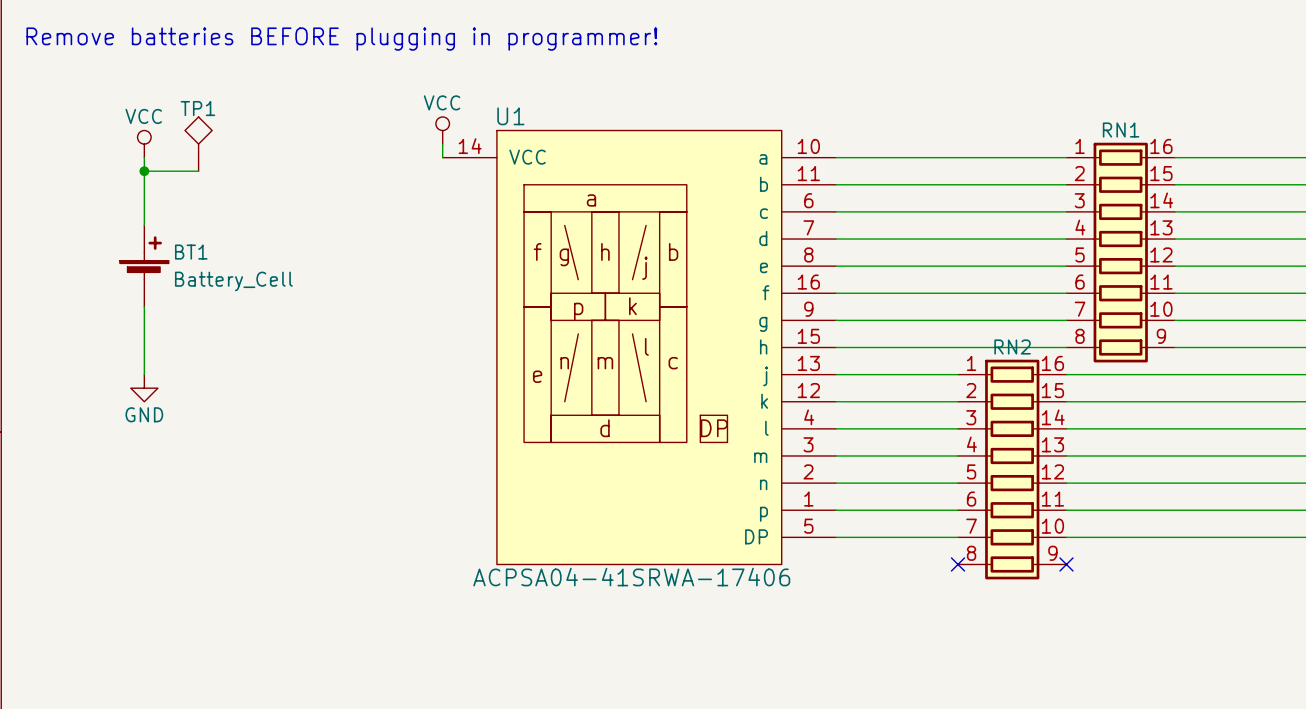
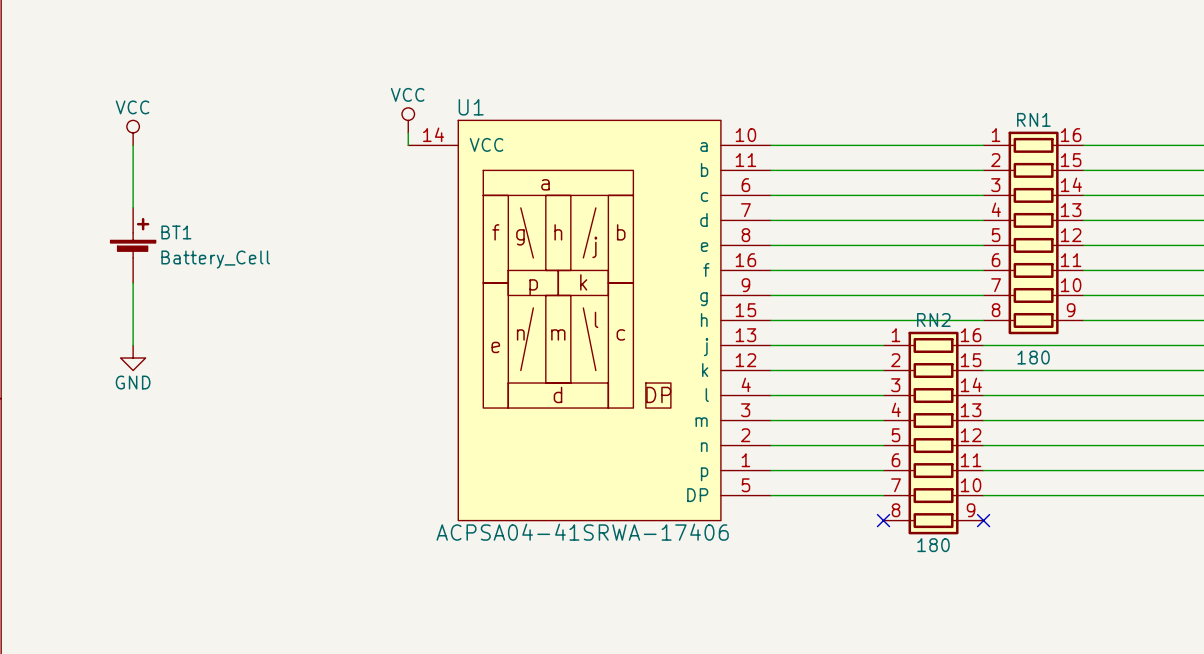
text: Remove batteries BEFORE plugging in programmer! (341, 39) -> none
TP1: (198, 144) -> none
wire: (144, 171) (198, 171) -> none
junction: (144, 171) -> none
RN1 value: none -> 180 (1033, 357)
RN2 value: none -> 180 (933, 545)

